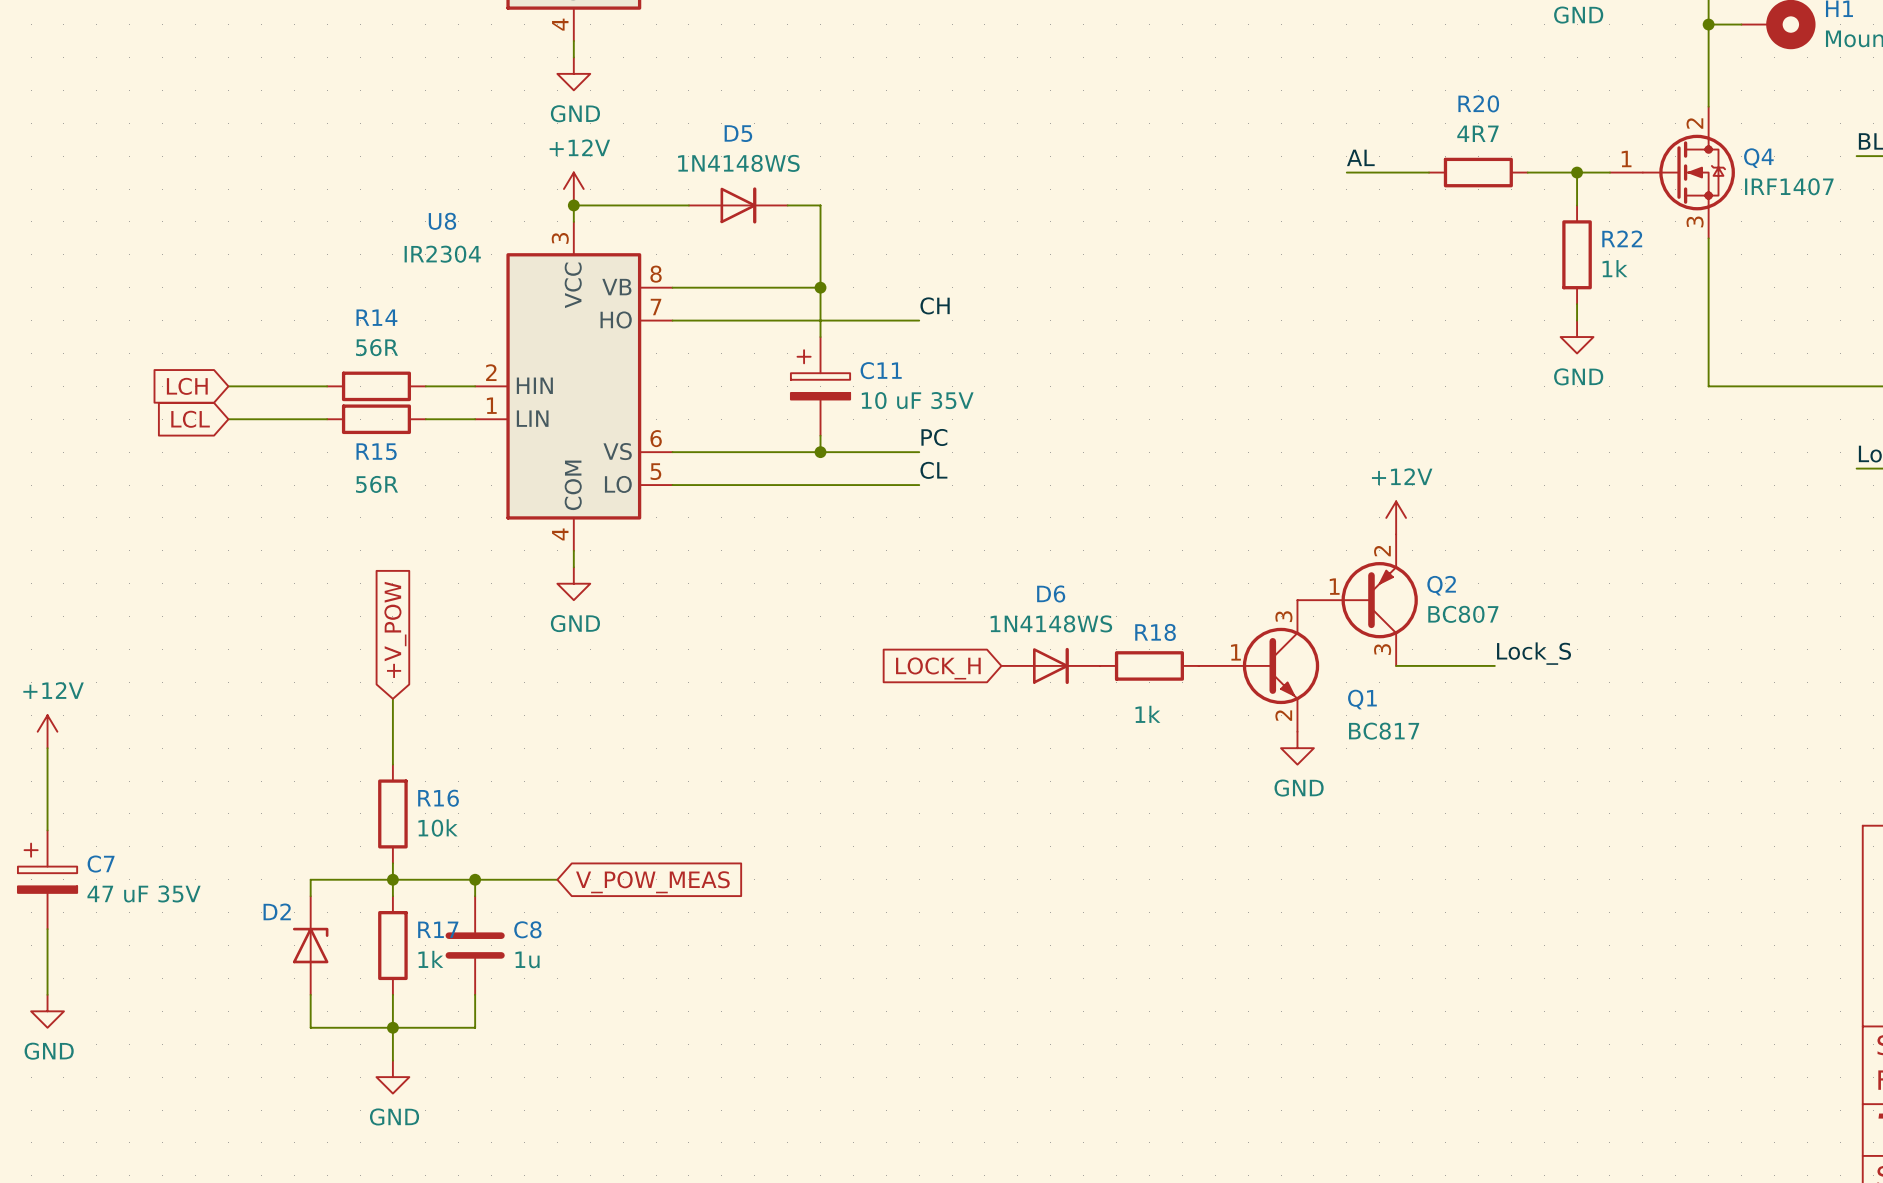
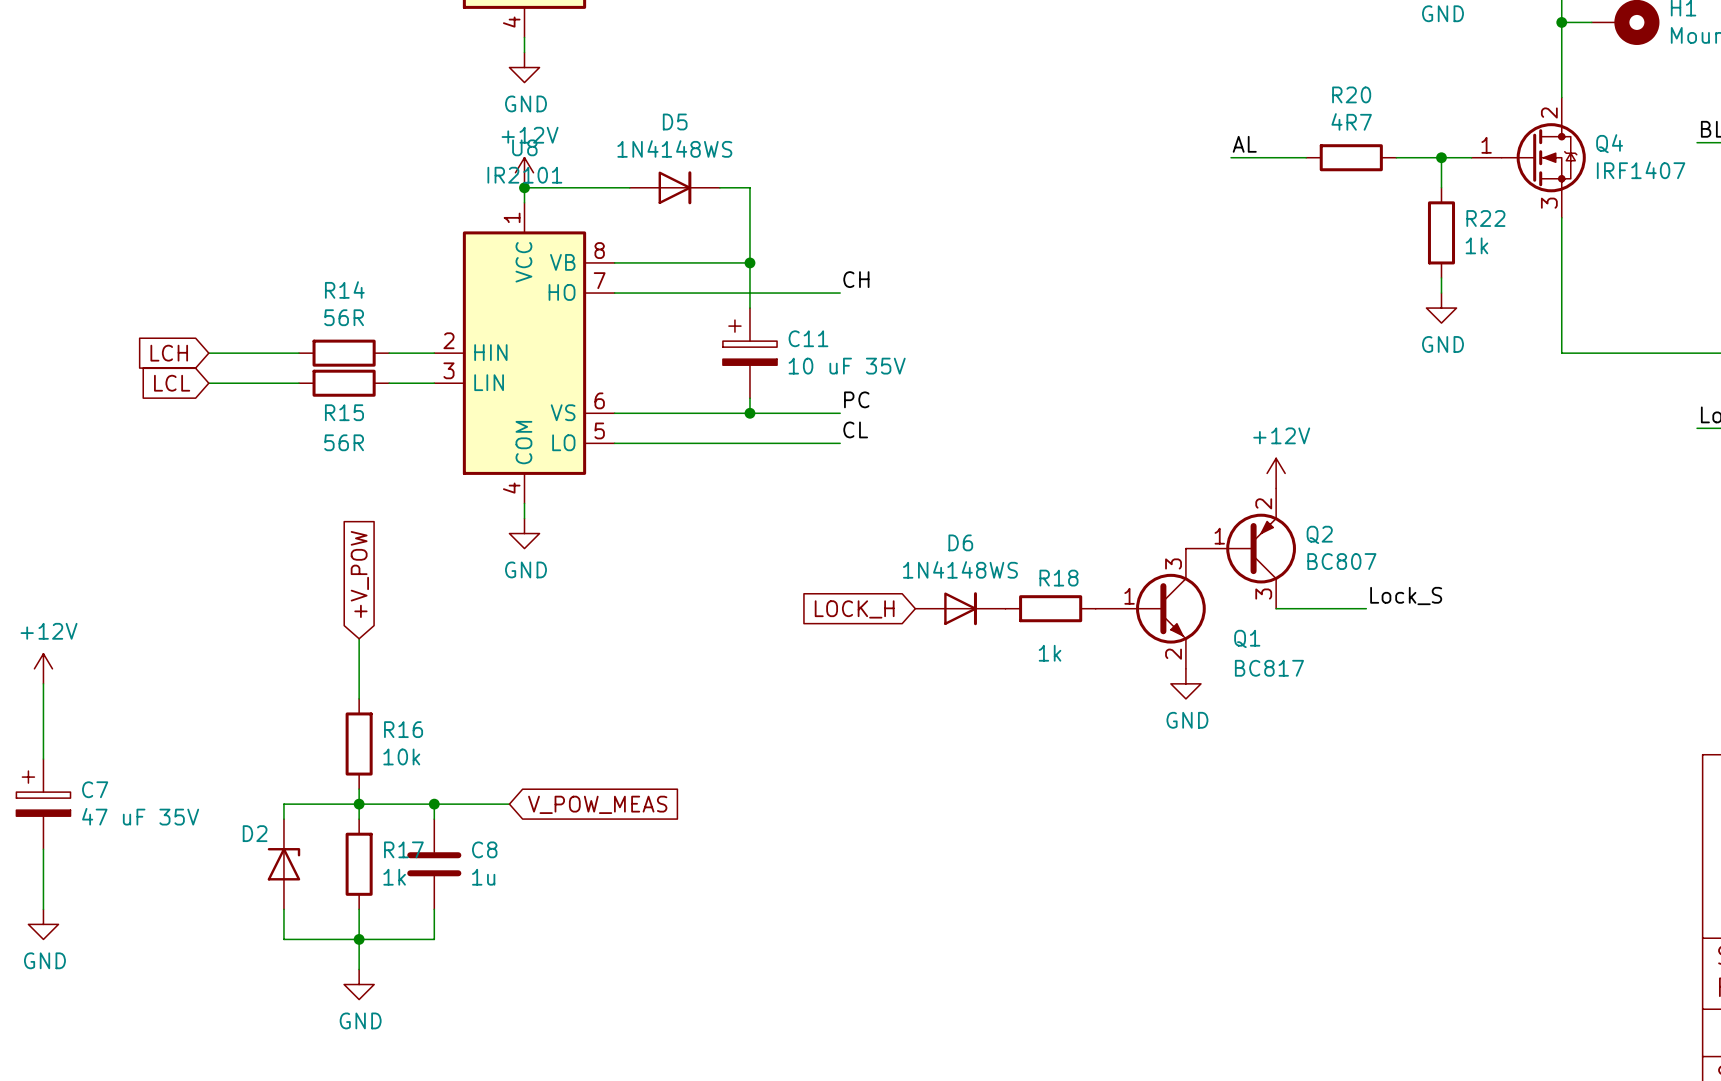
U8 name position: U8 (442, 221) -> U8 (524, 147)
U8 pin number: 3 (560, 238) -> 1 (512, 217)
U8 value: IR2304 (442, 254) -> IR2101 (524, 175)
U8 pin number: 1 (491, 405) -> 3 (448, 370)

